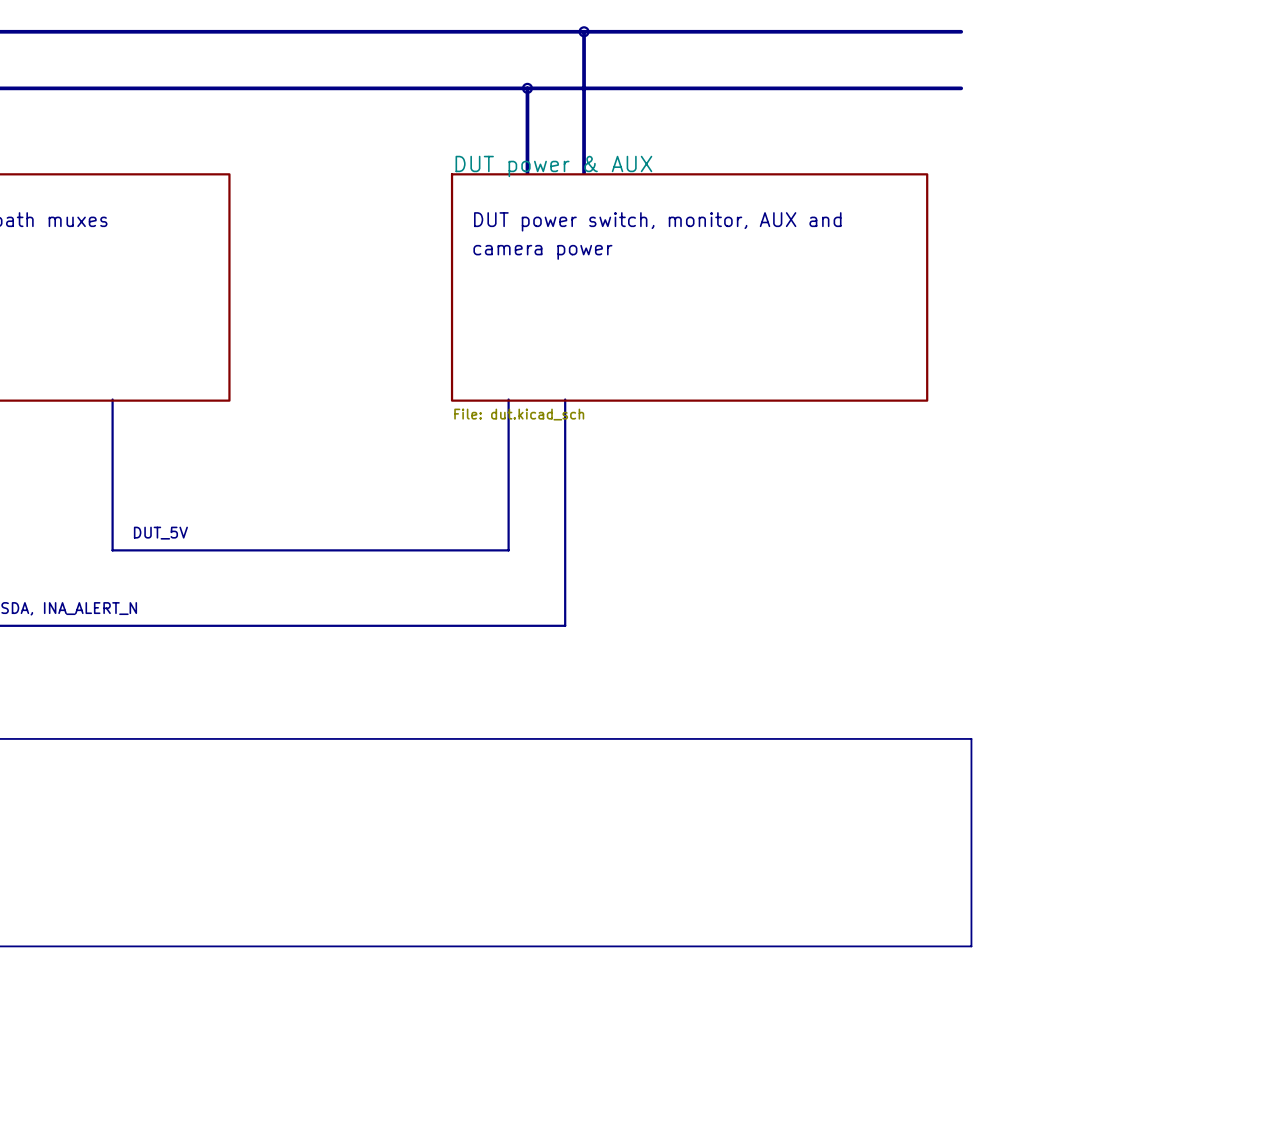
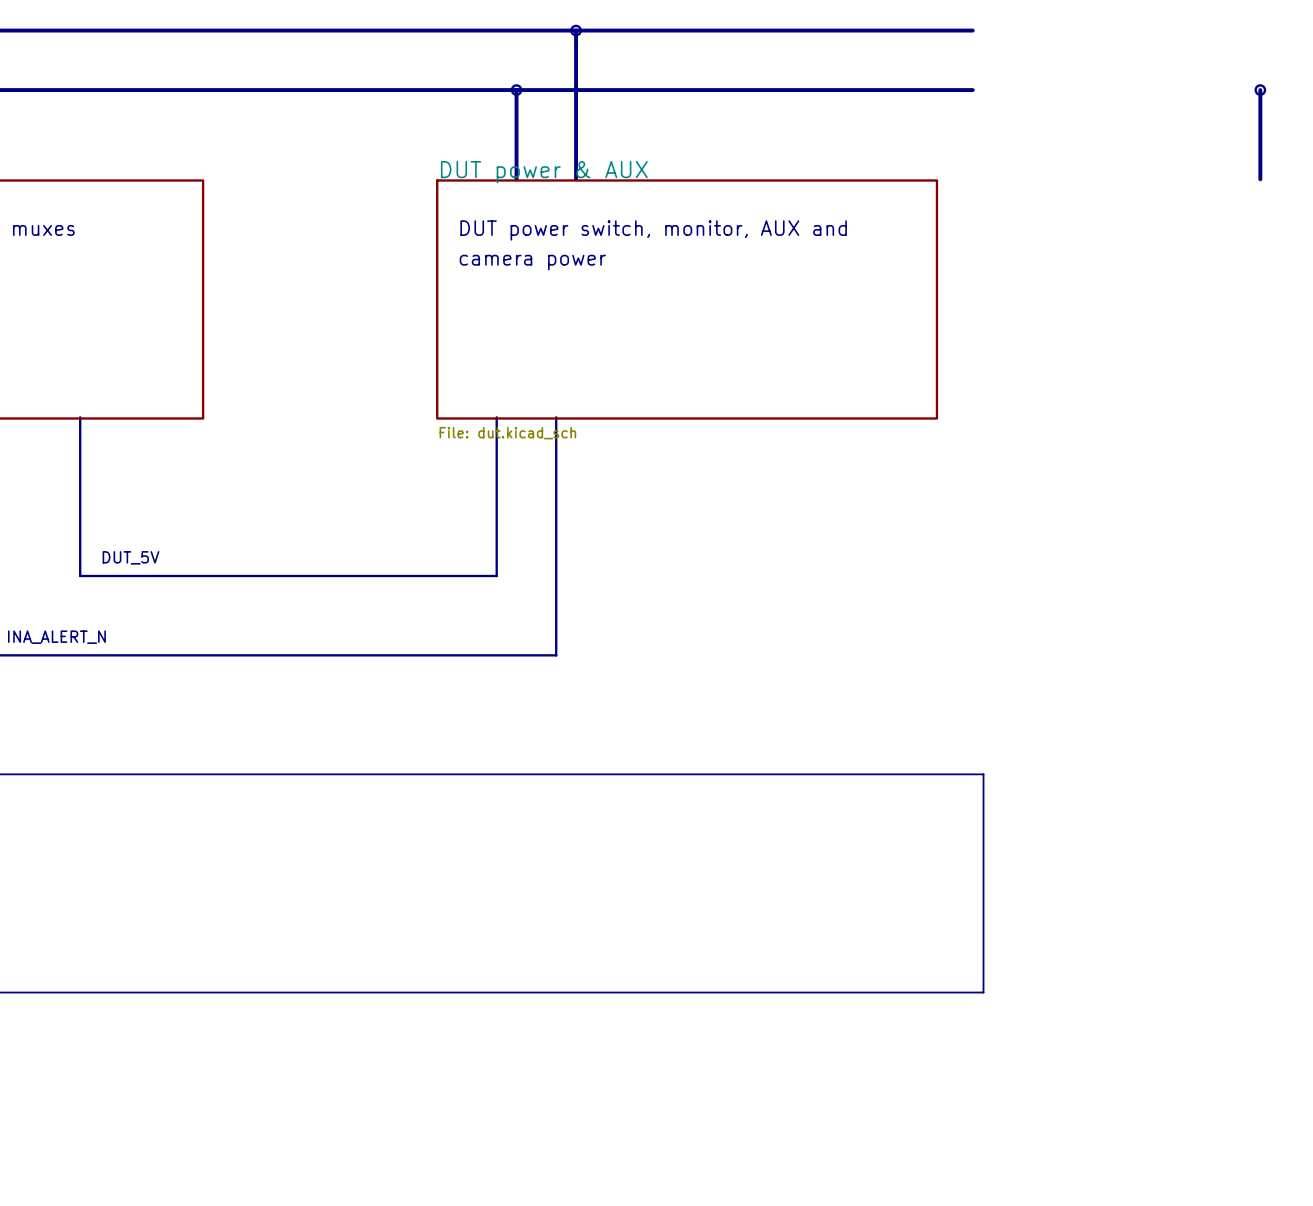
drawing: none -> [1254, 84, 1267, 96]
line: none -> (1260, 90) (1260, 179)

